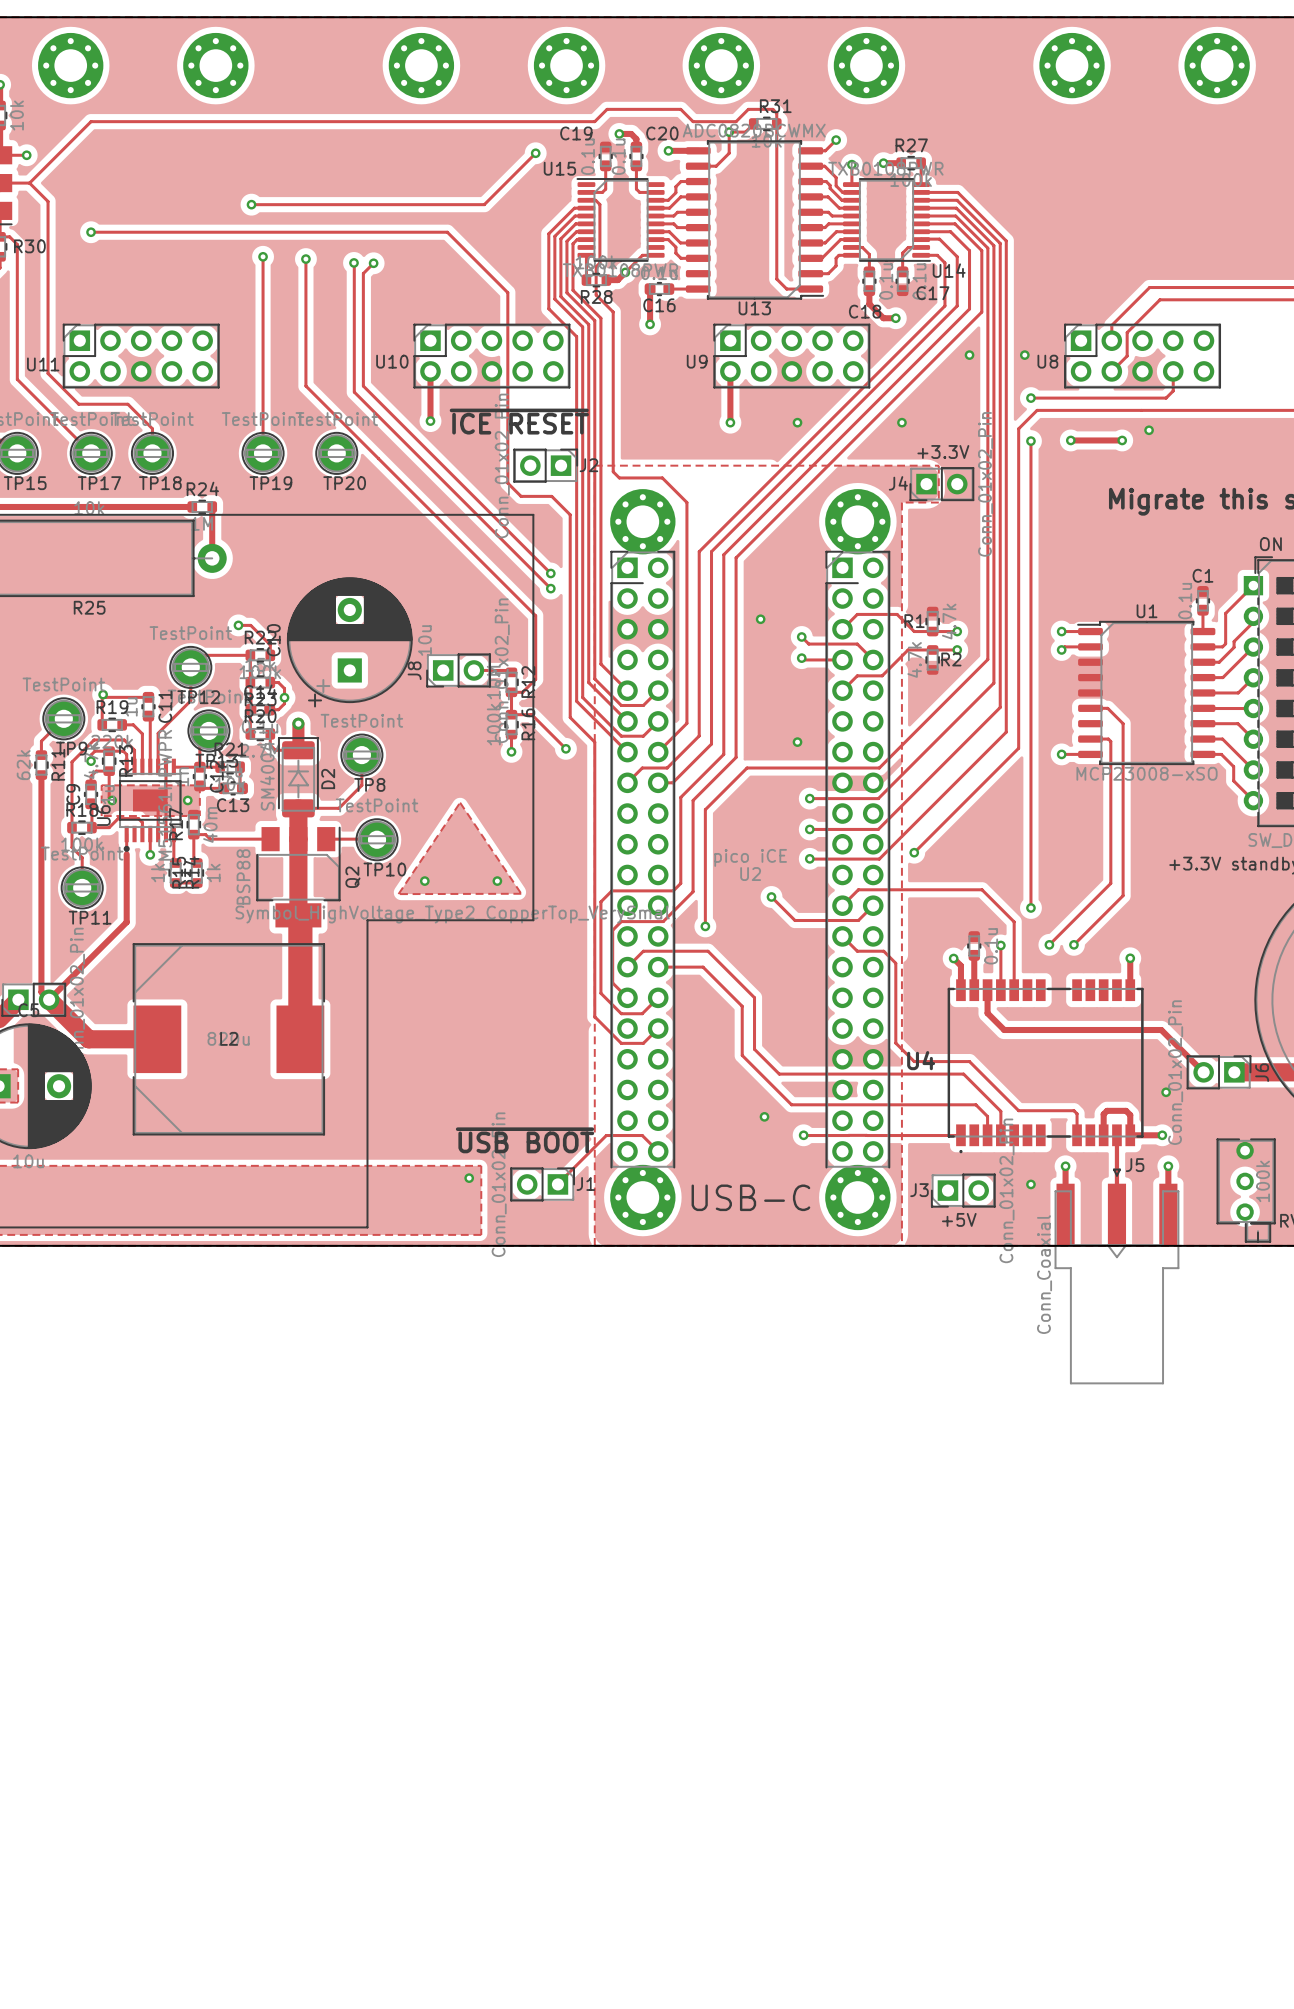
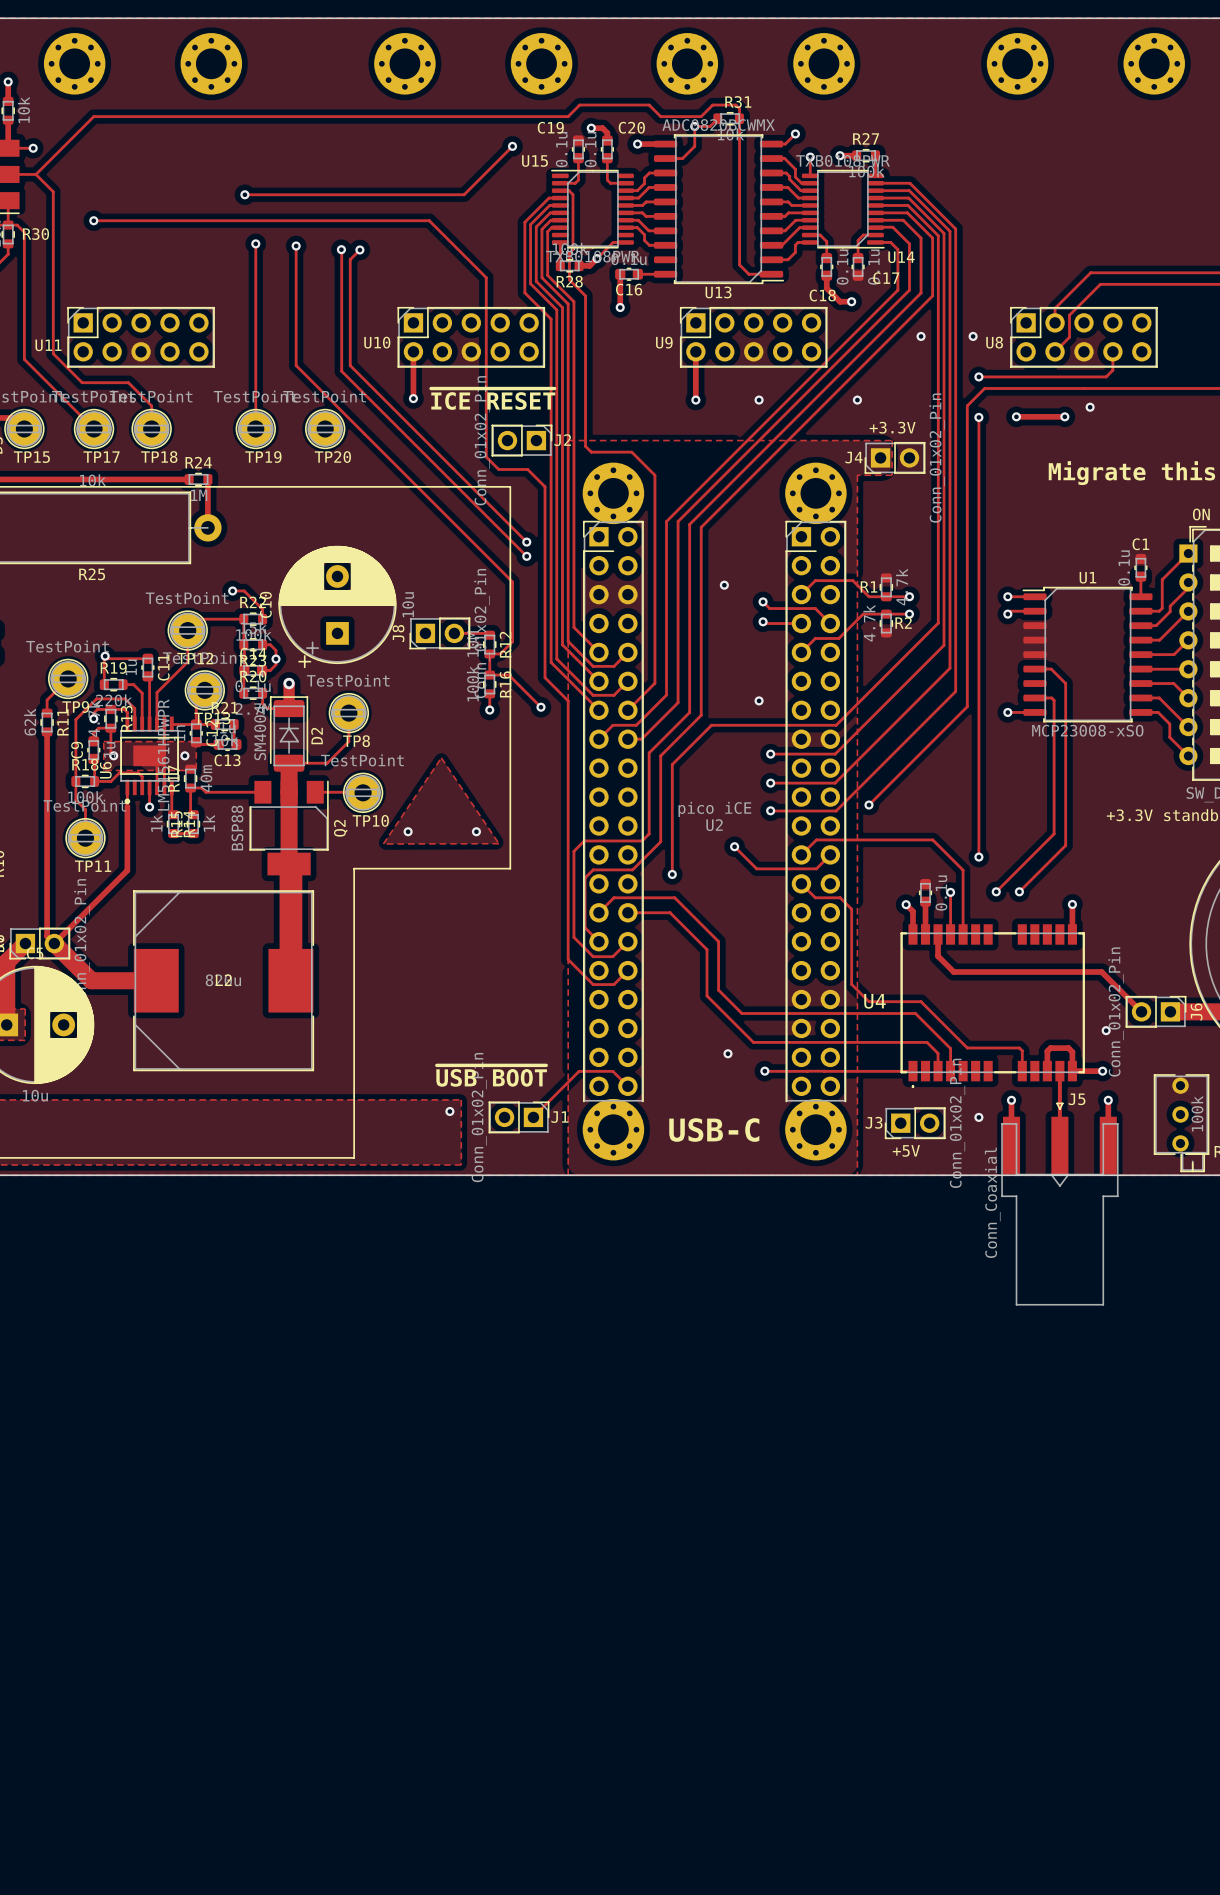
drawing: [235, 905, 677, 924] -> none

